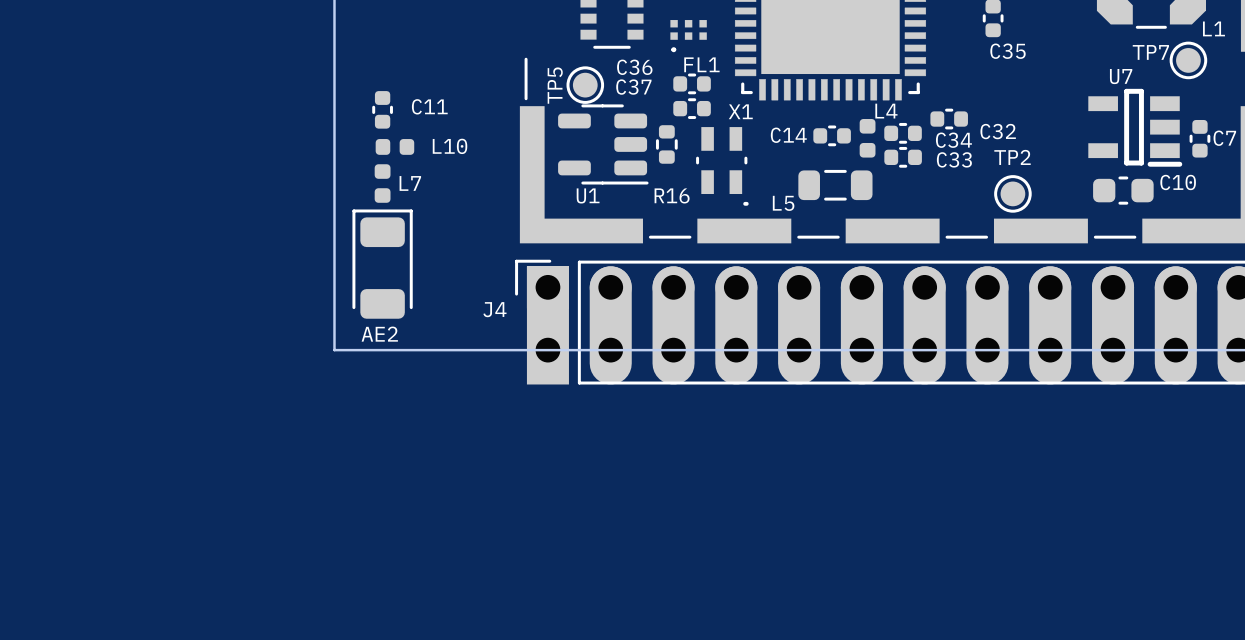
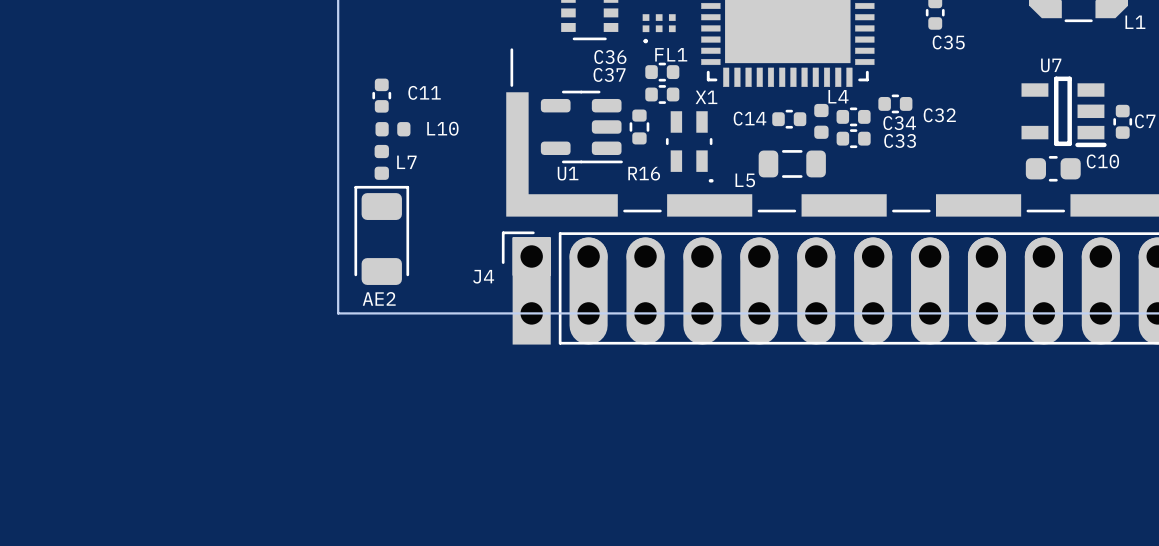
TP7: (1188, 60) -> none
TP5: (585, 85) -> none
TP2: (1012, 193) -> none

